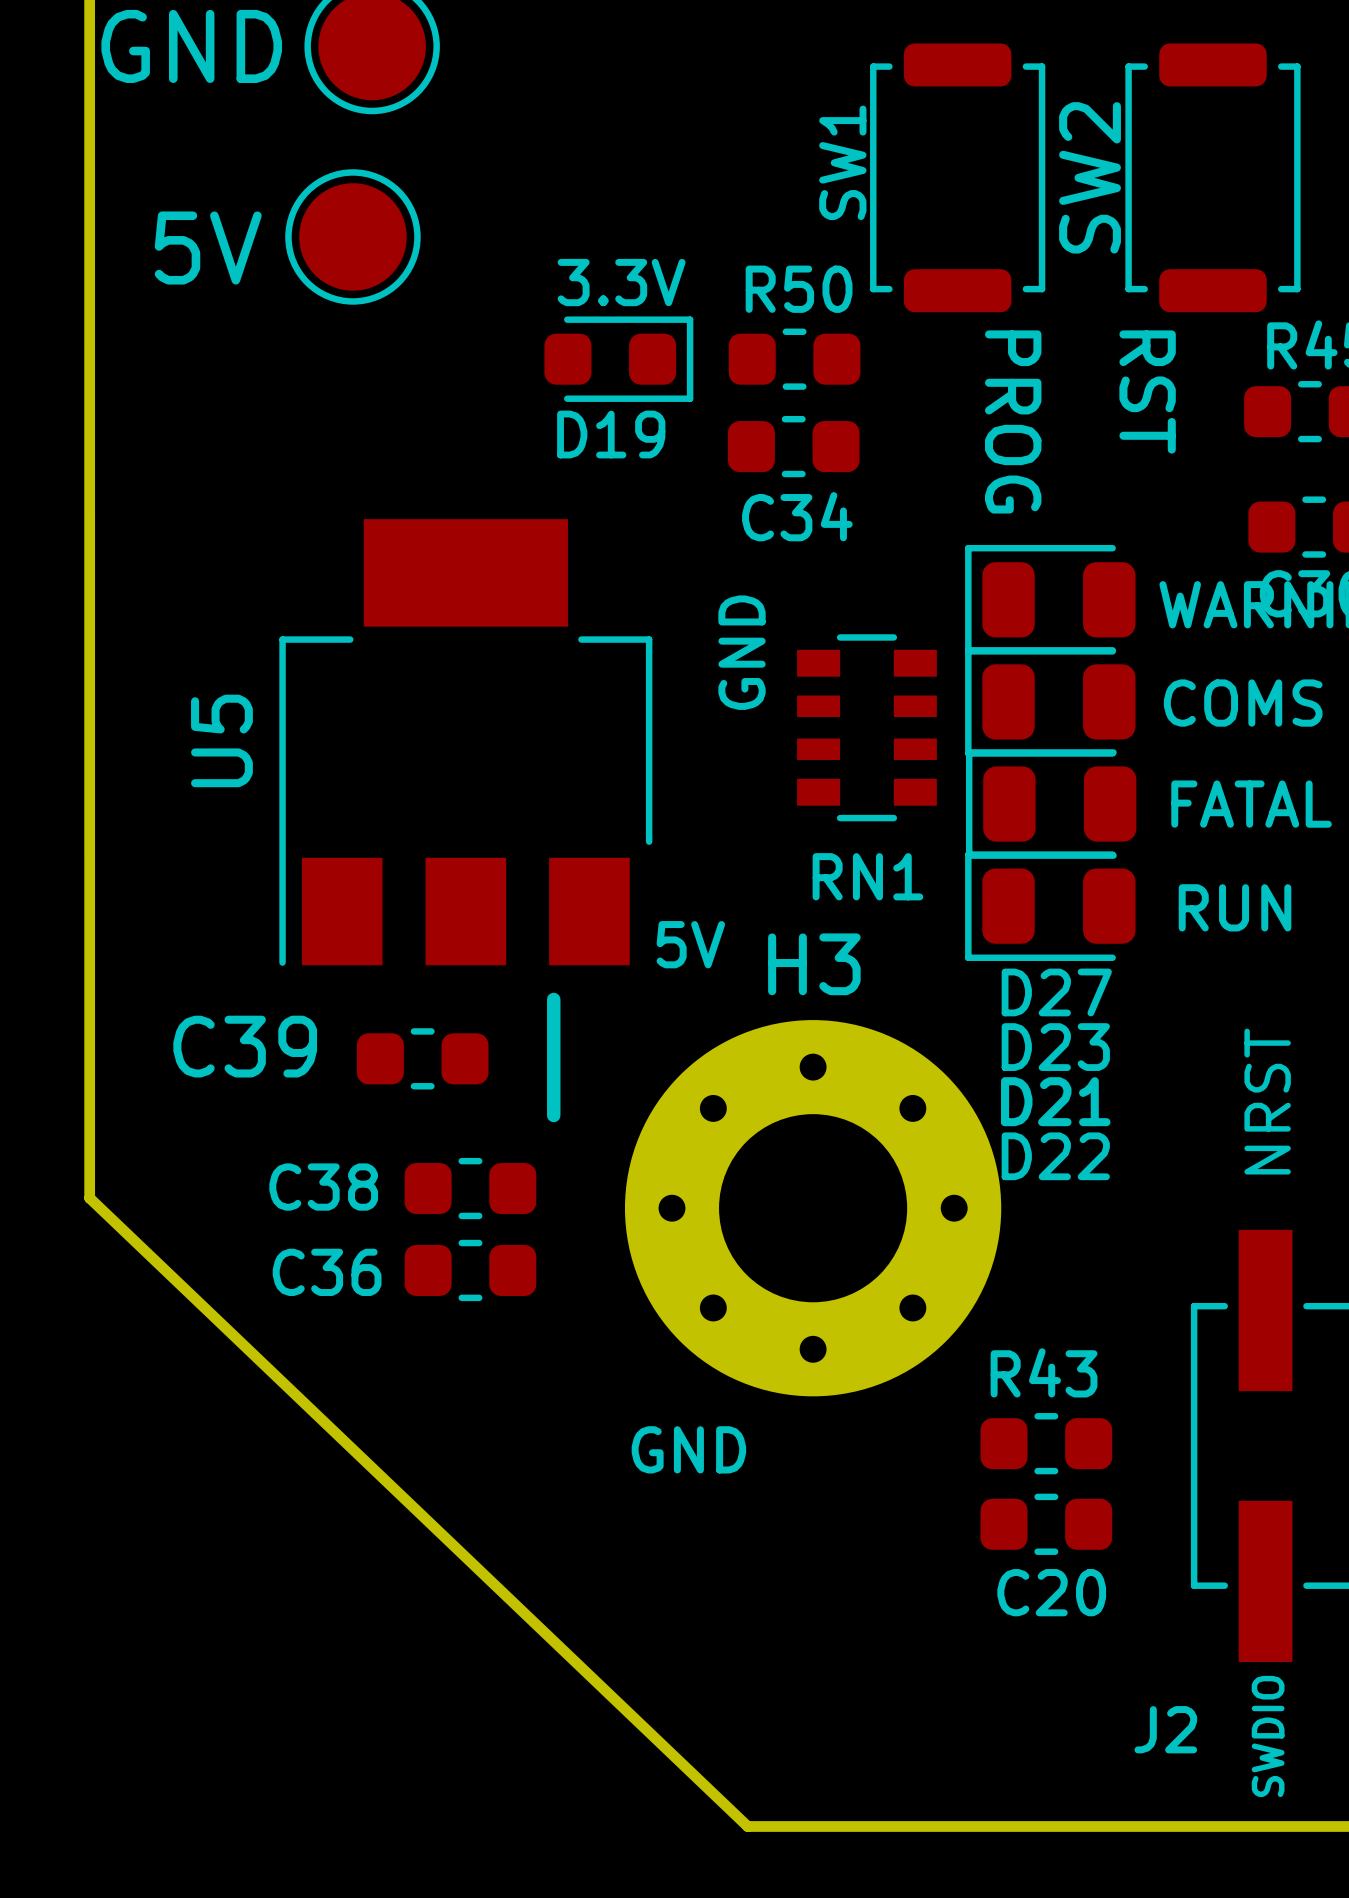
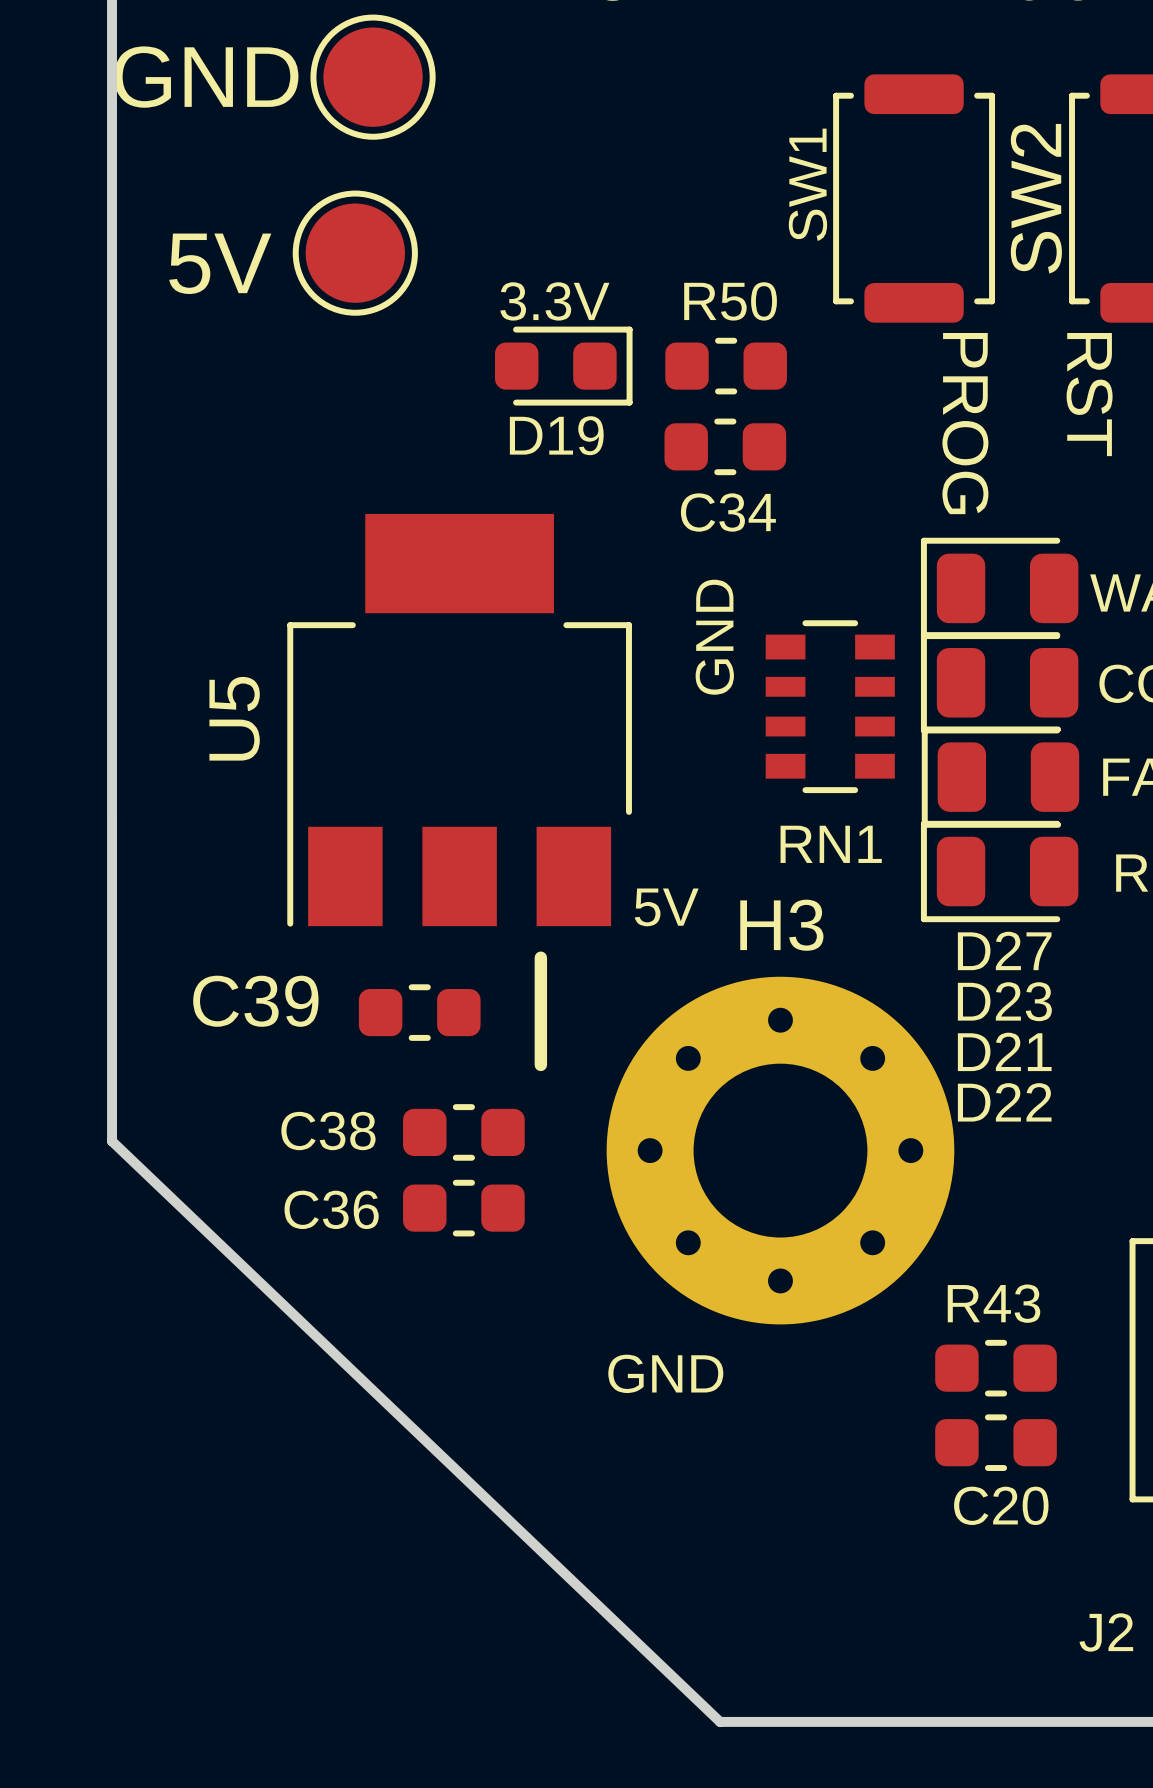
text position: 3.3V (621, 282) -> 3.3V (554, 301)
D19 position: (618, 359) -> (563, 366)
R50 position: (794, 359) -> (726, 366)
C34 position: (793, 446) -> (725, 446)

